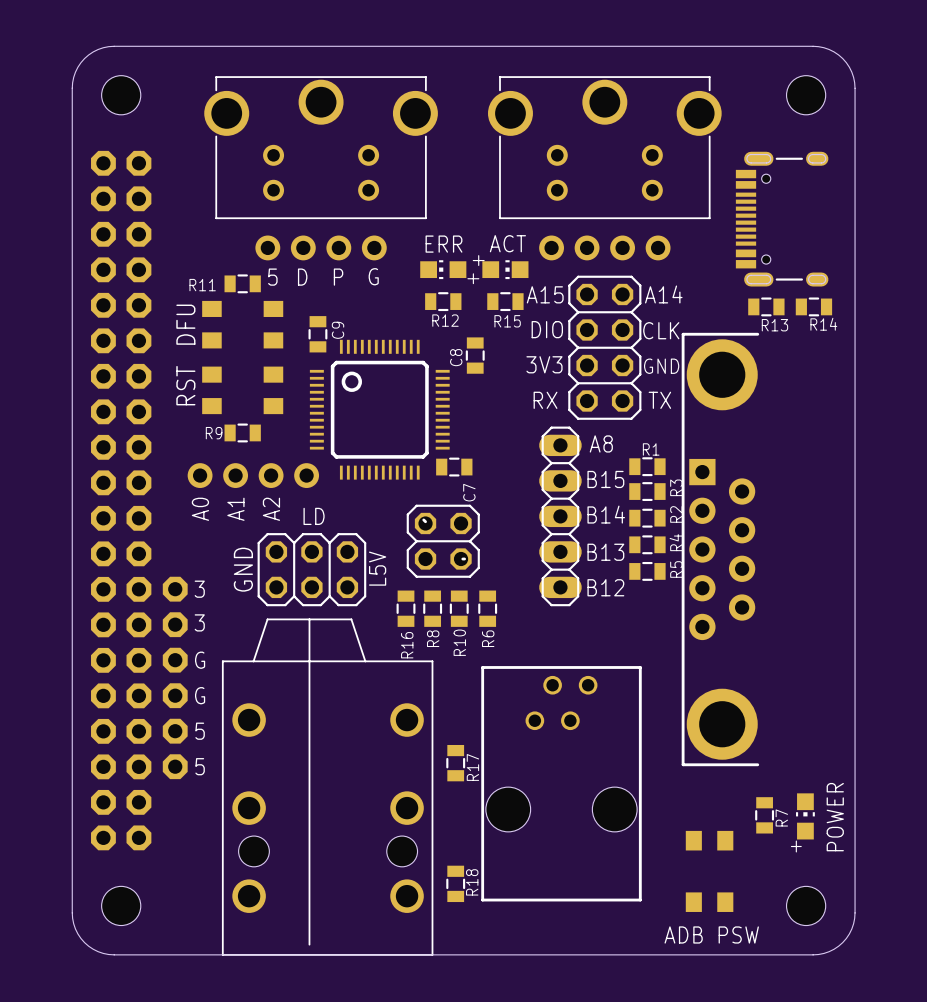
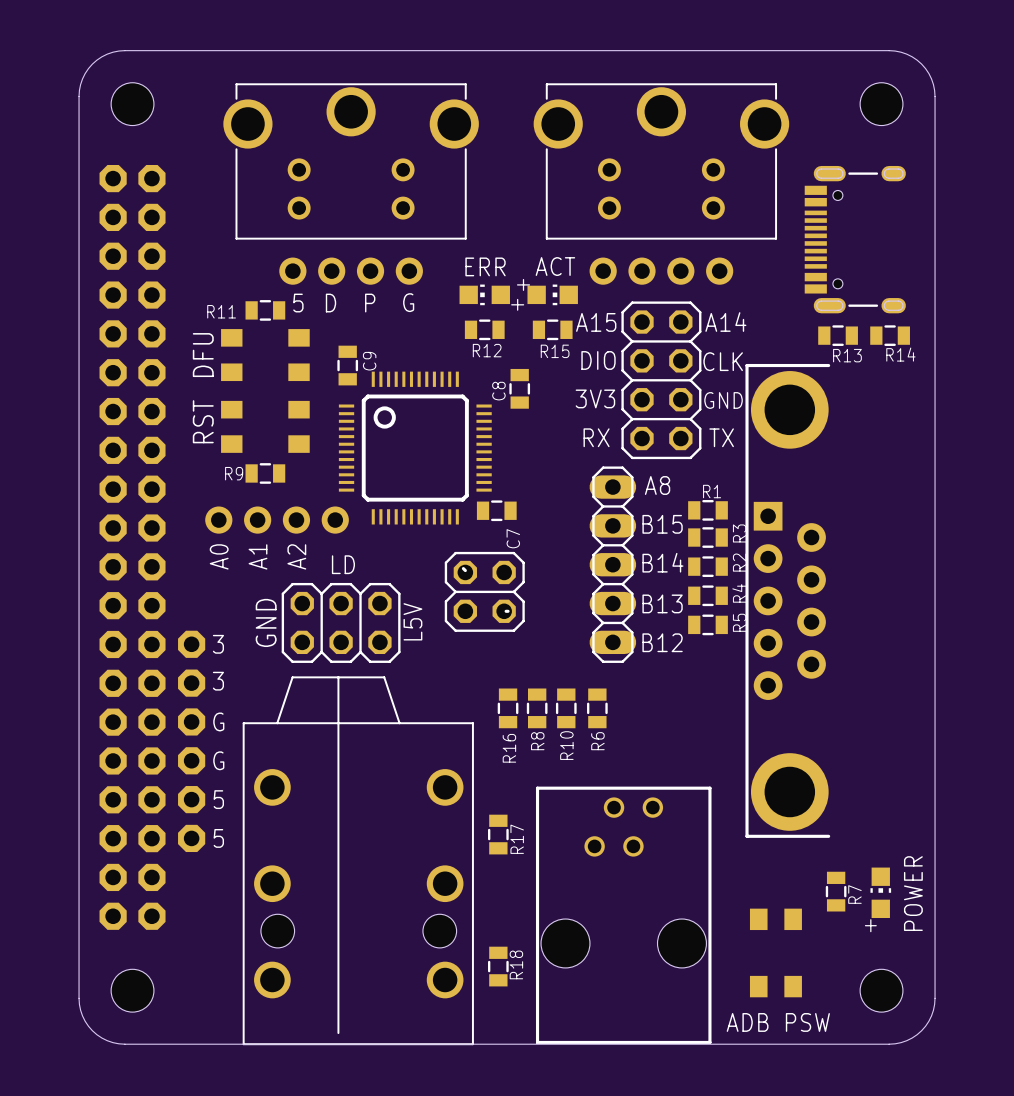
R16 position: (406, 608) -> (508, 708)
R8 position: (432, 608) -> (537, 708)
R10 position: (459, 608) -> (566, 708)
R6 position: (487, 608) -> (597, 708)
part position: (561, 783) -> (623, 915)

